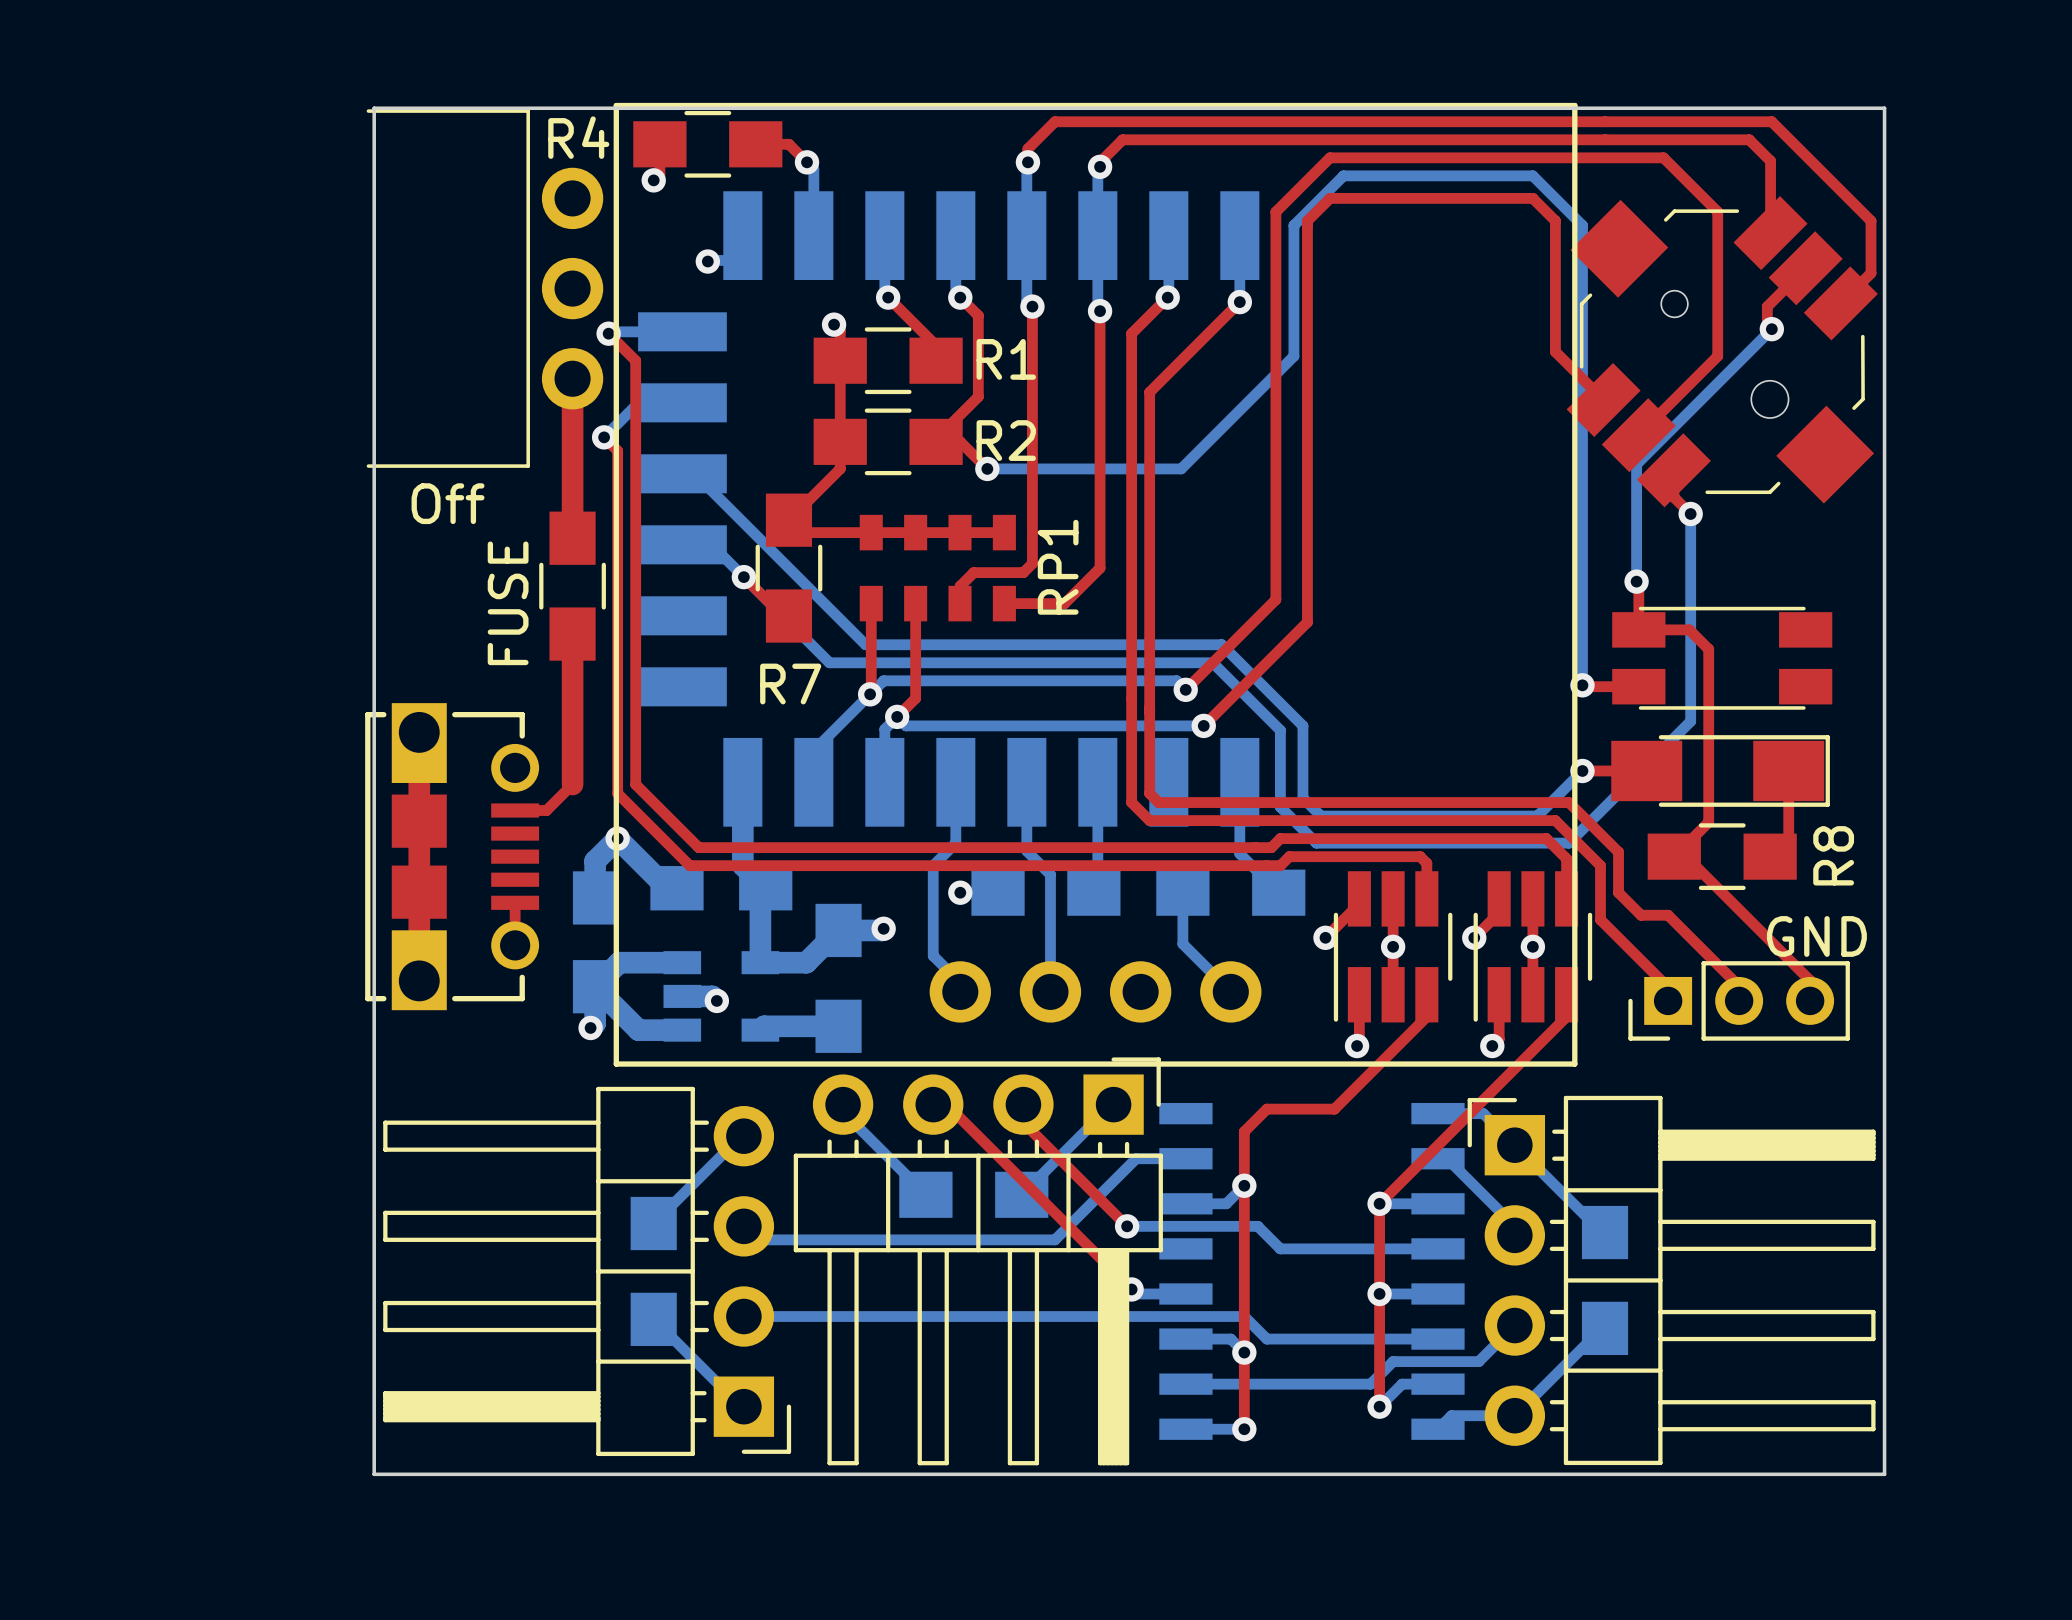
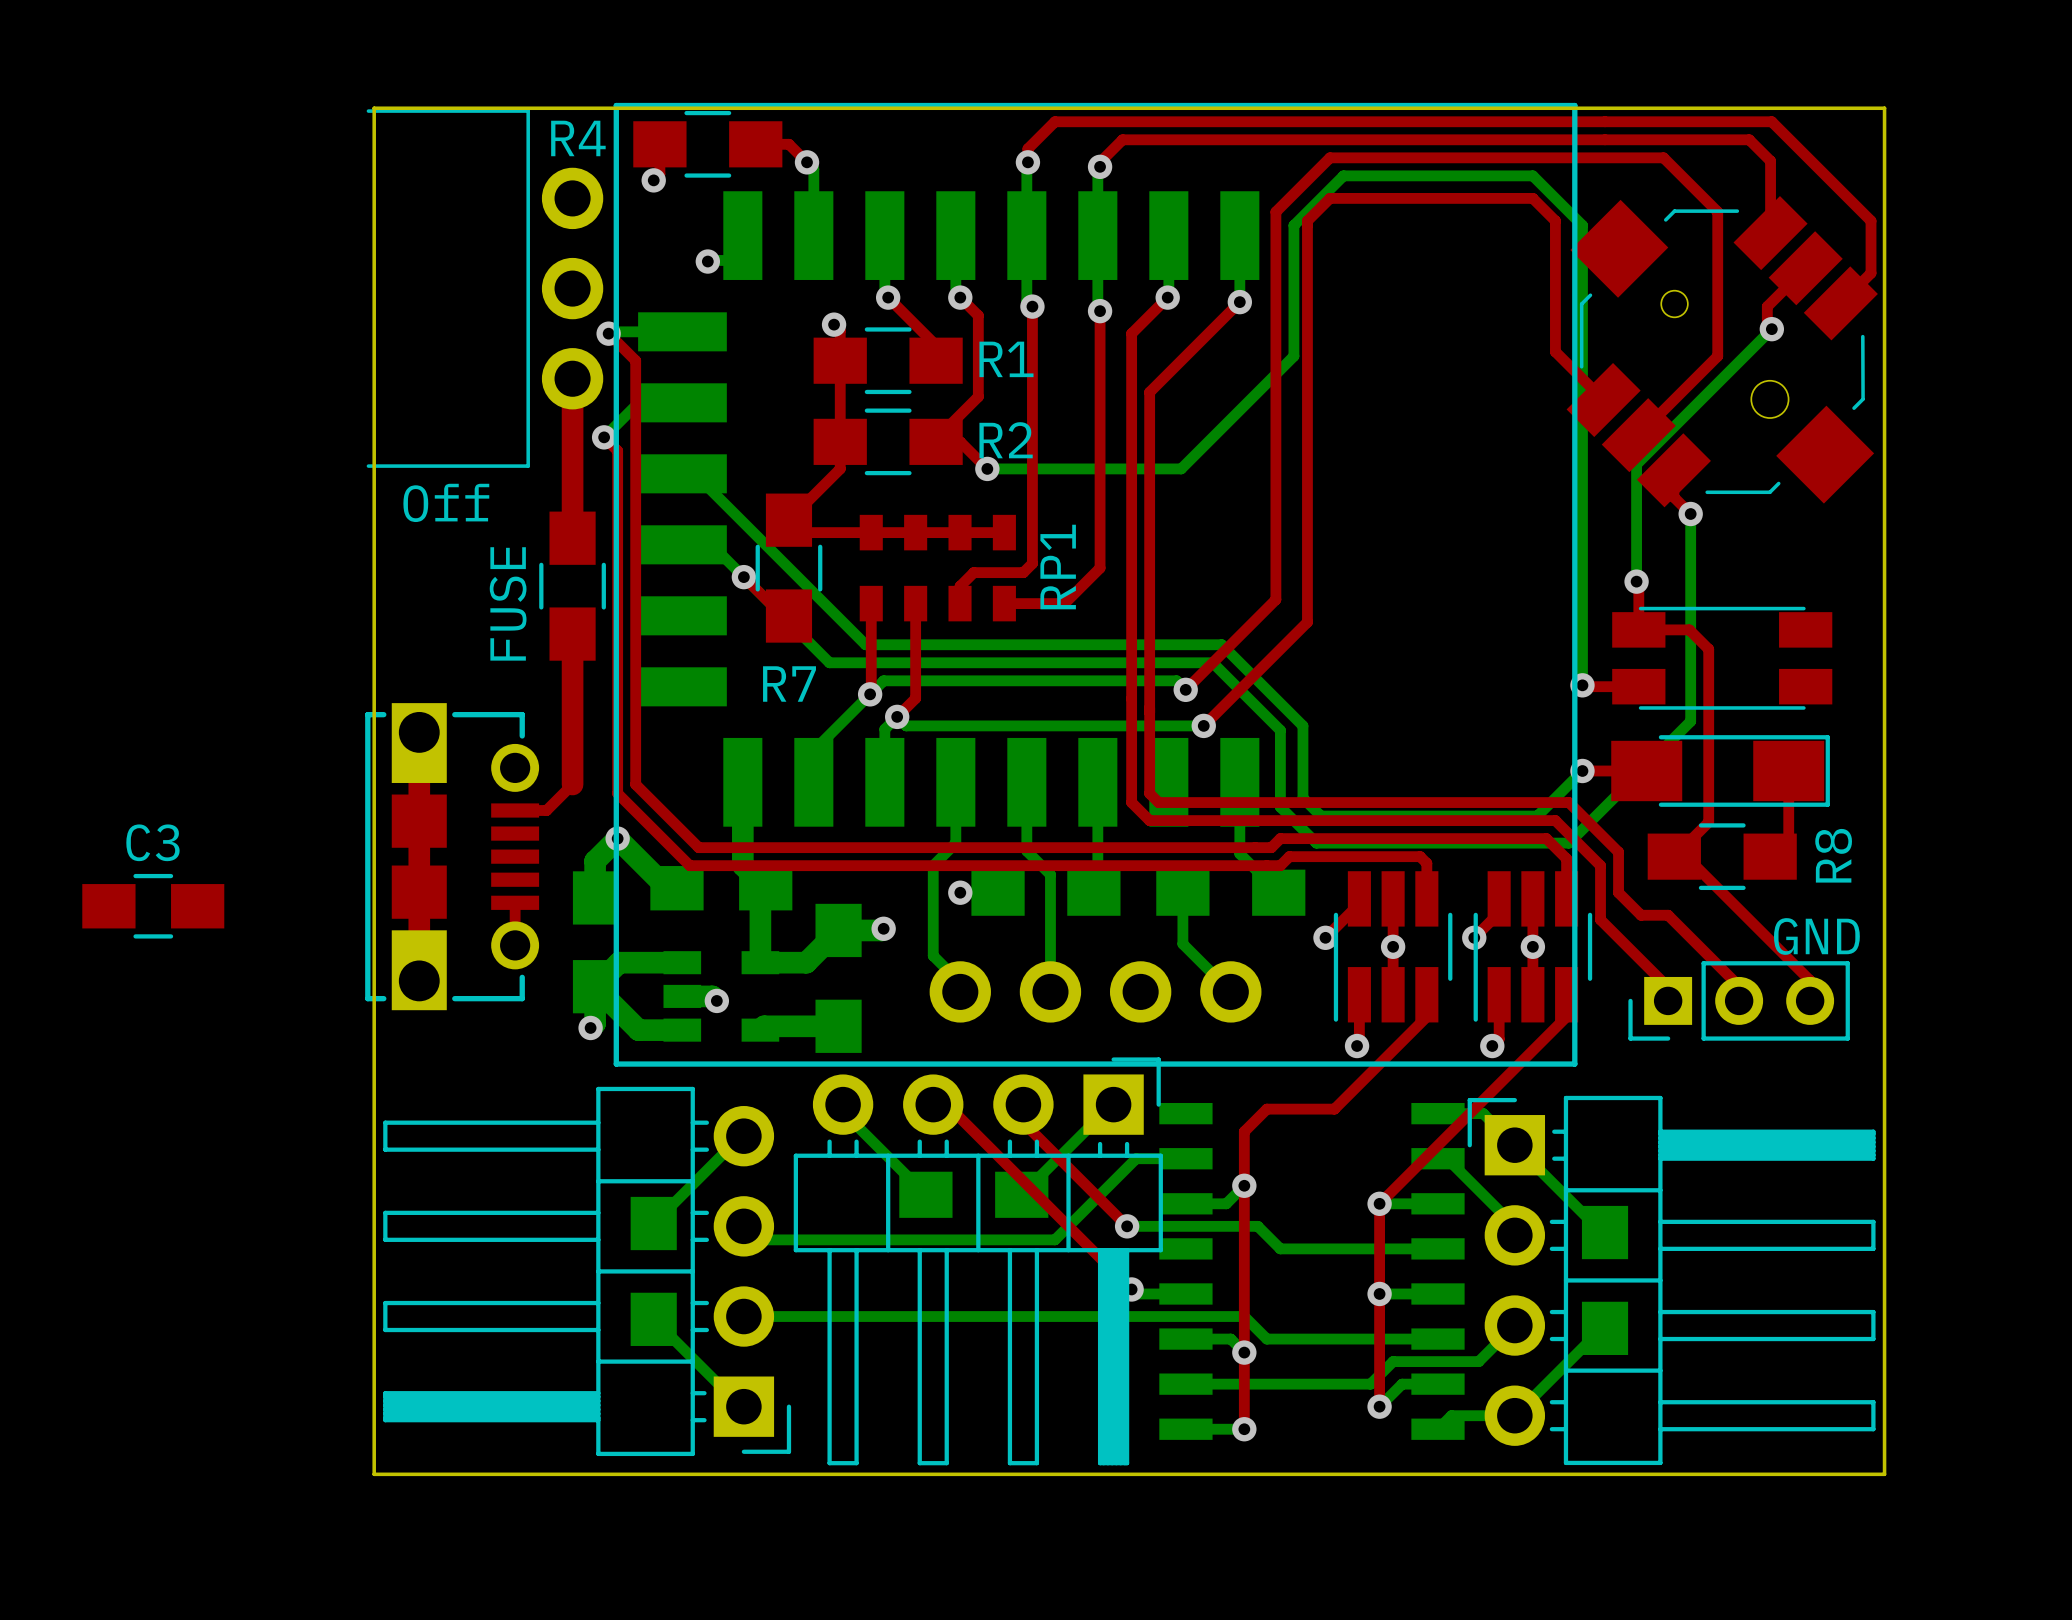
C3: none -> (153, 906)

